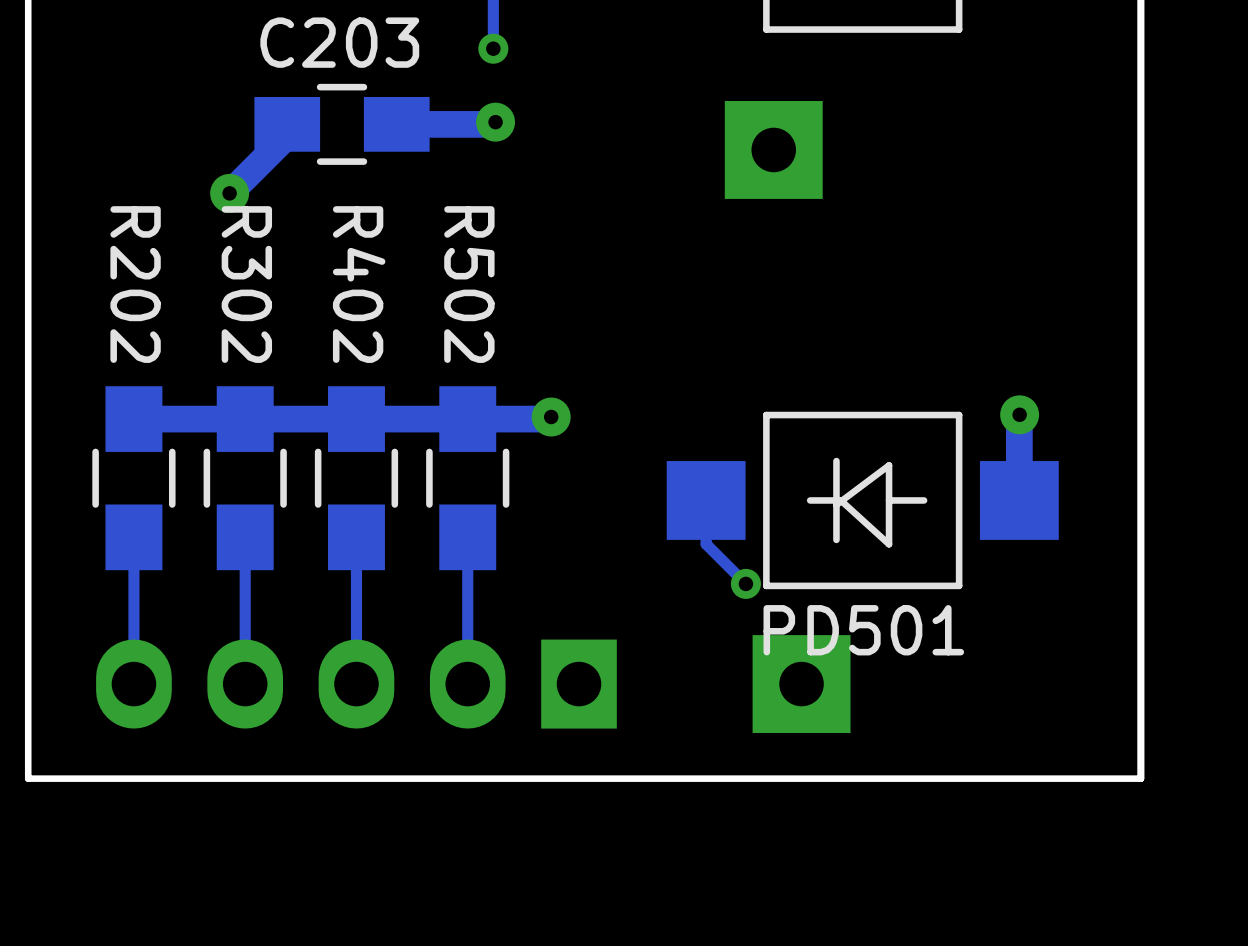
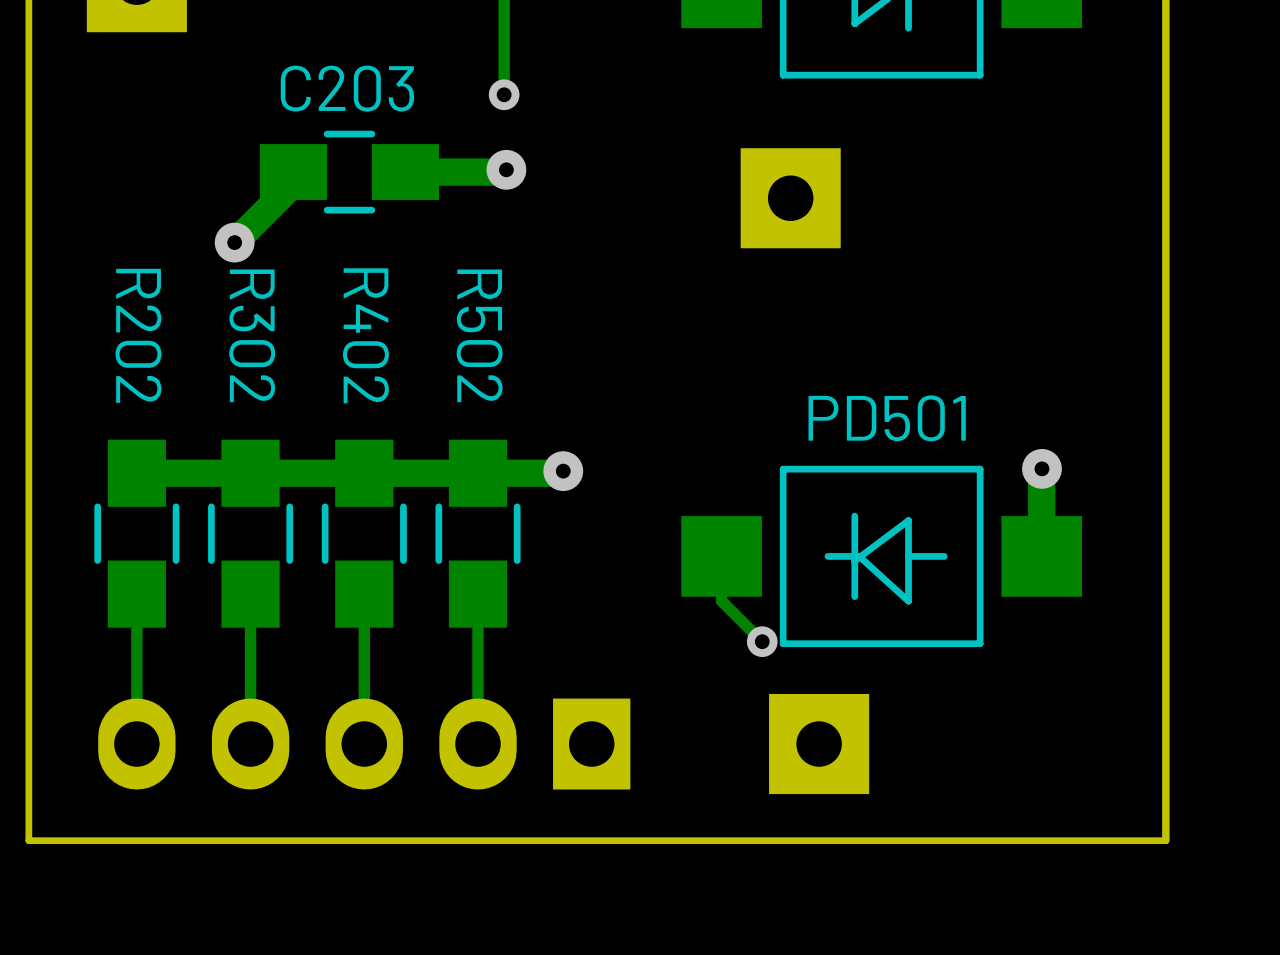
PD501 name position: PD501 (863, 630) -> PD501 (887, 418)

